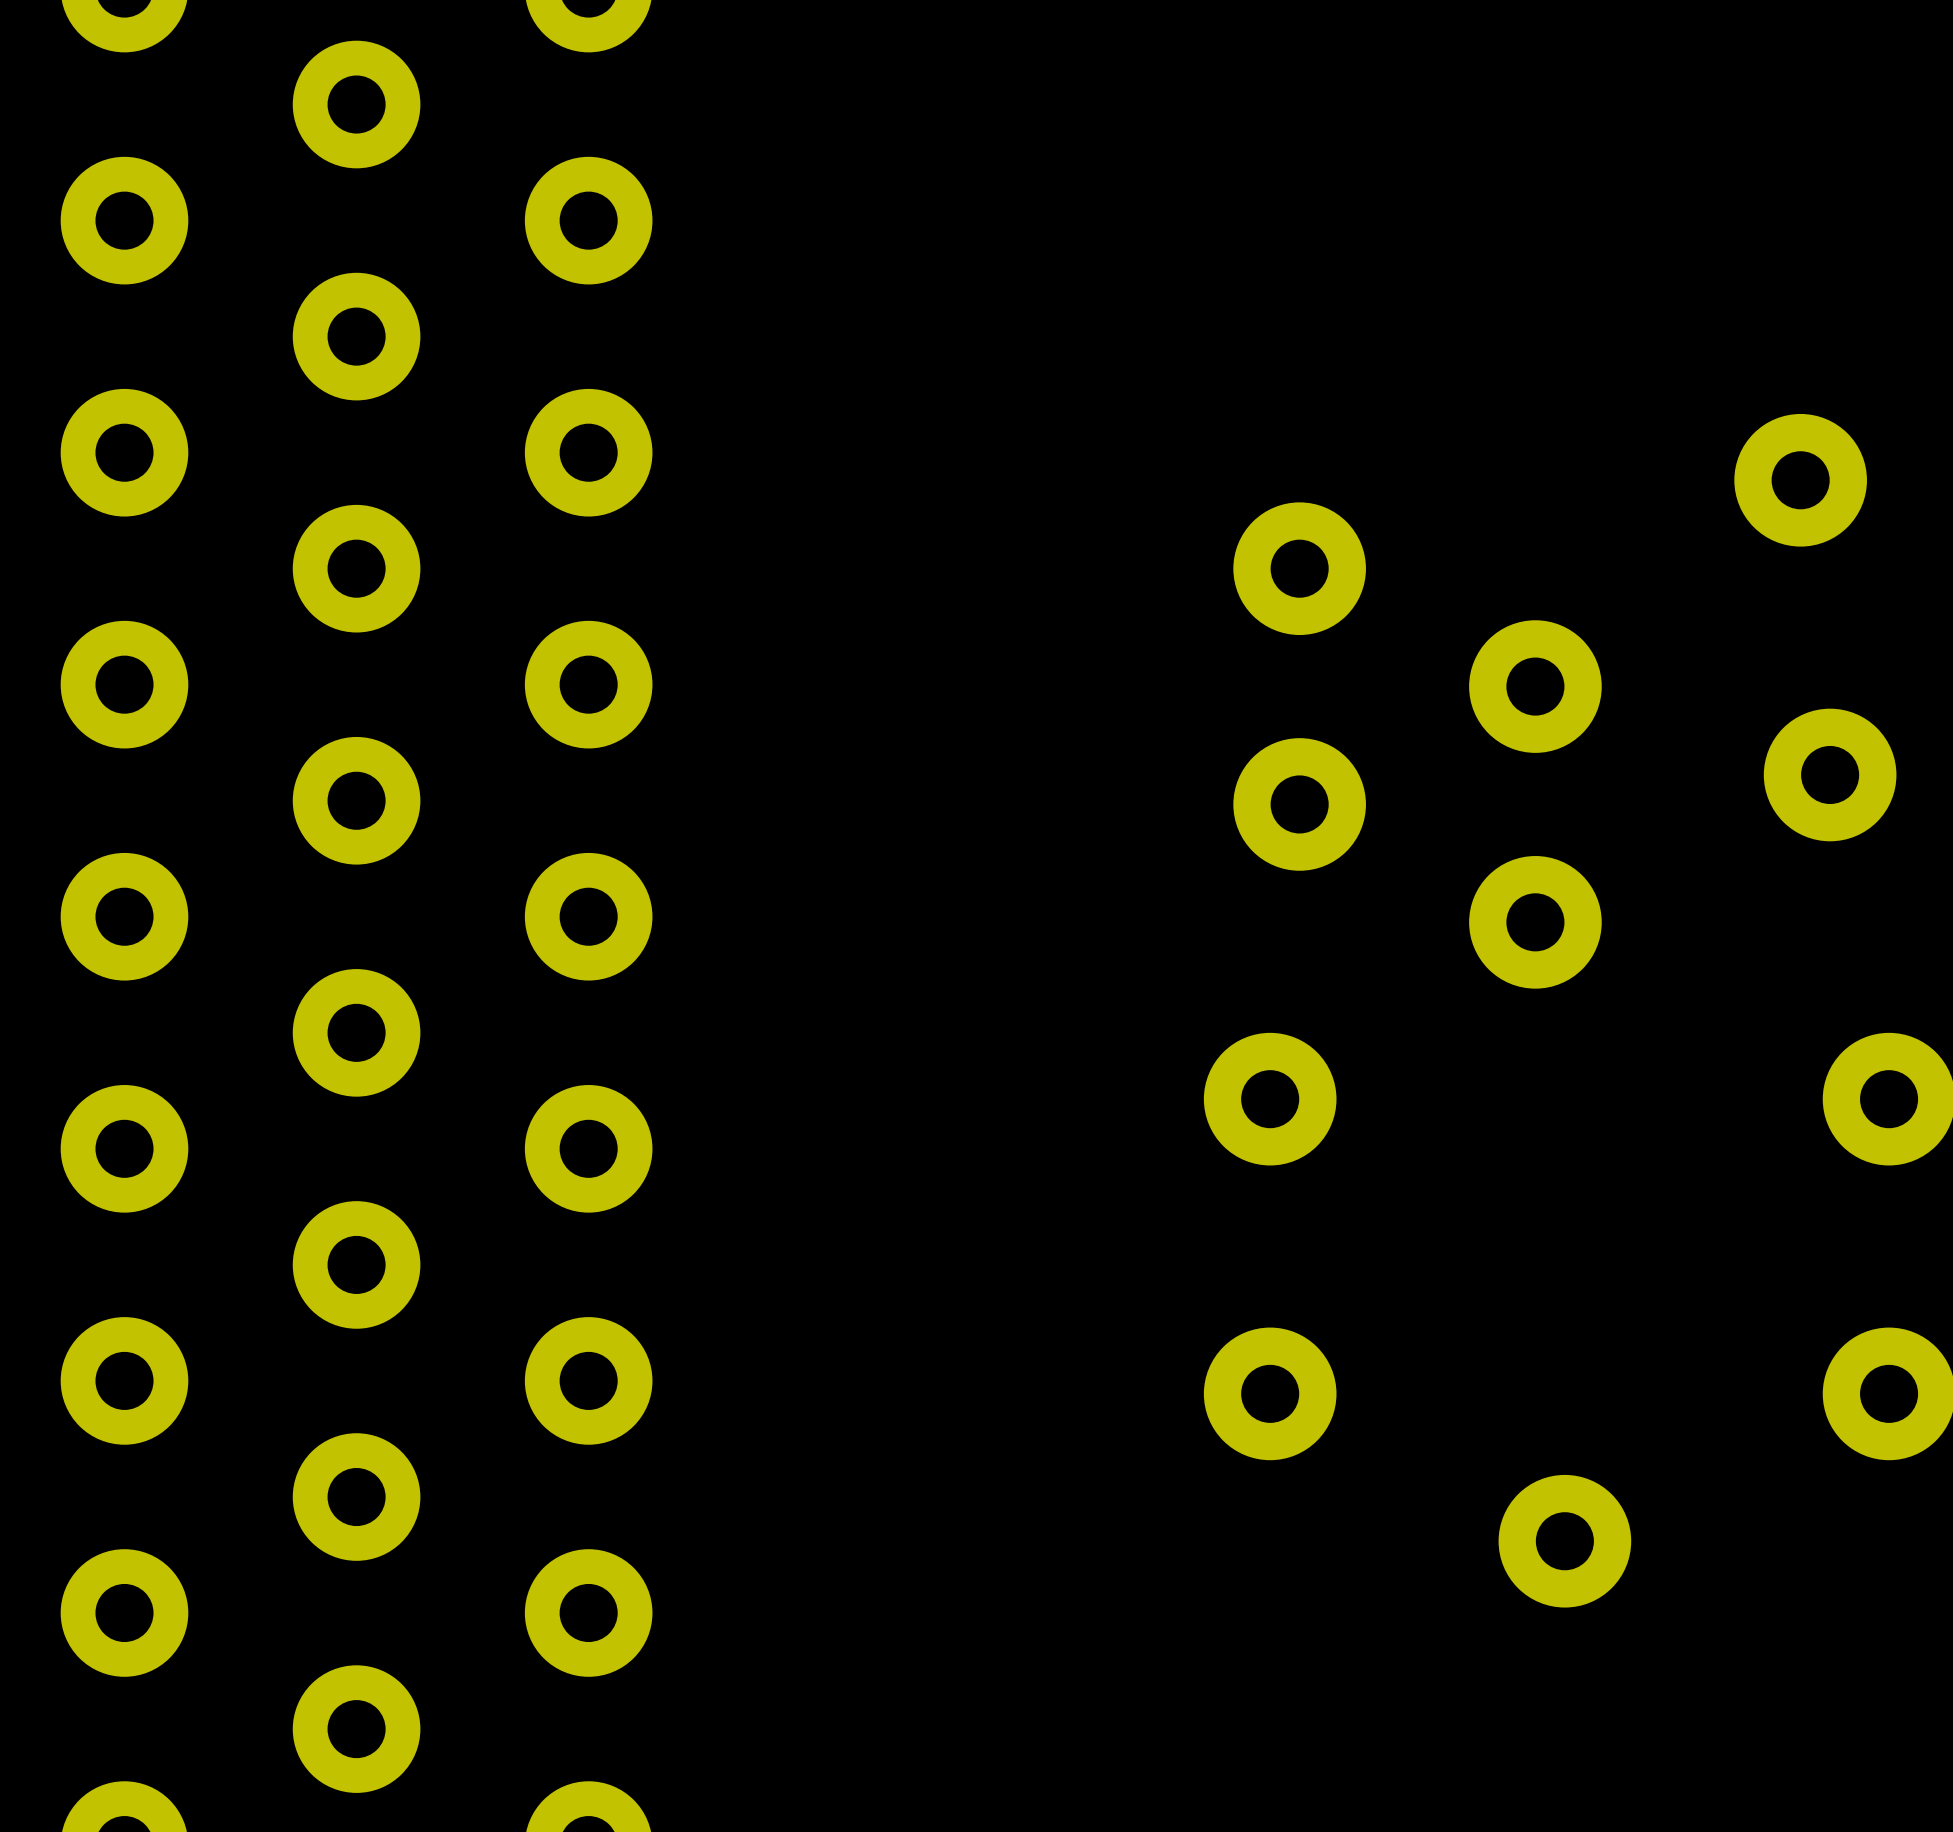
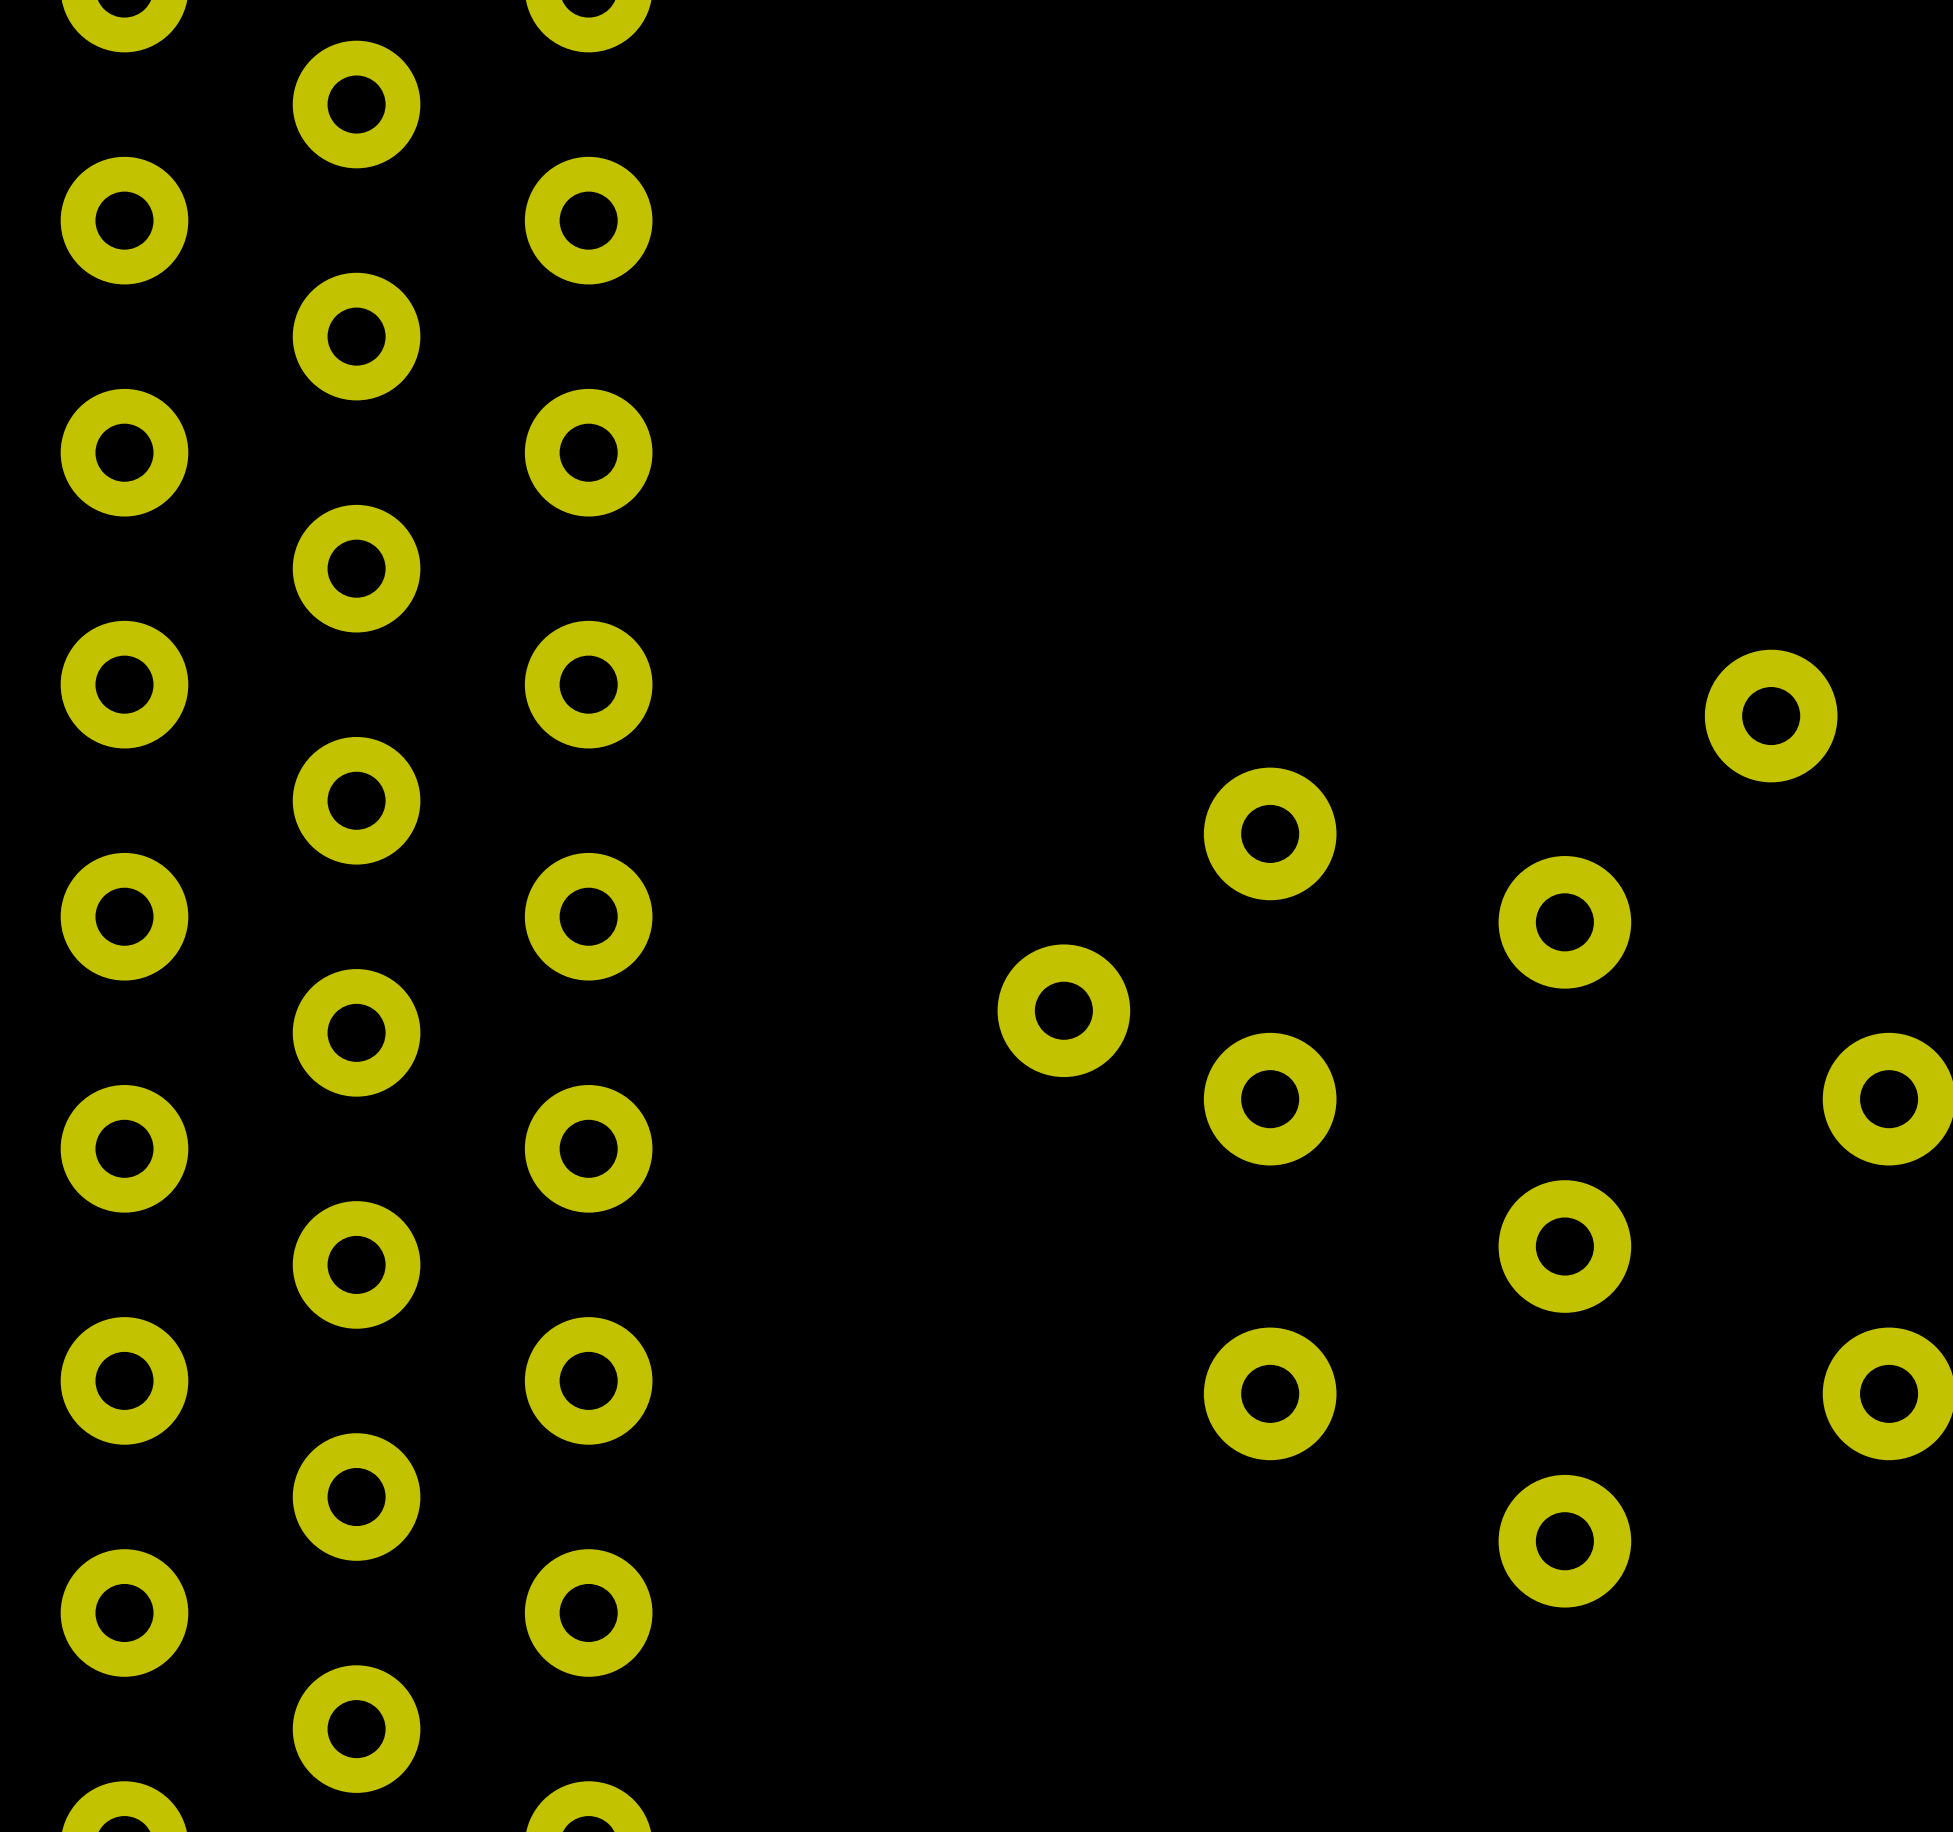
part: (1800, 480) -> none
part: (1299, 568) -> none
part: (1535, 686) -> none
part position: (1830, 774) -> (1771, 716)
part position: (1299, 804) -> (1270, 833)
part position: (1535, 922) -> (1564, 922)
part: none -> (1063, 1010)
part: none -> (1564, 1246)

